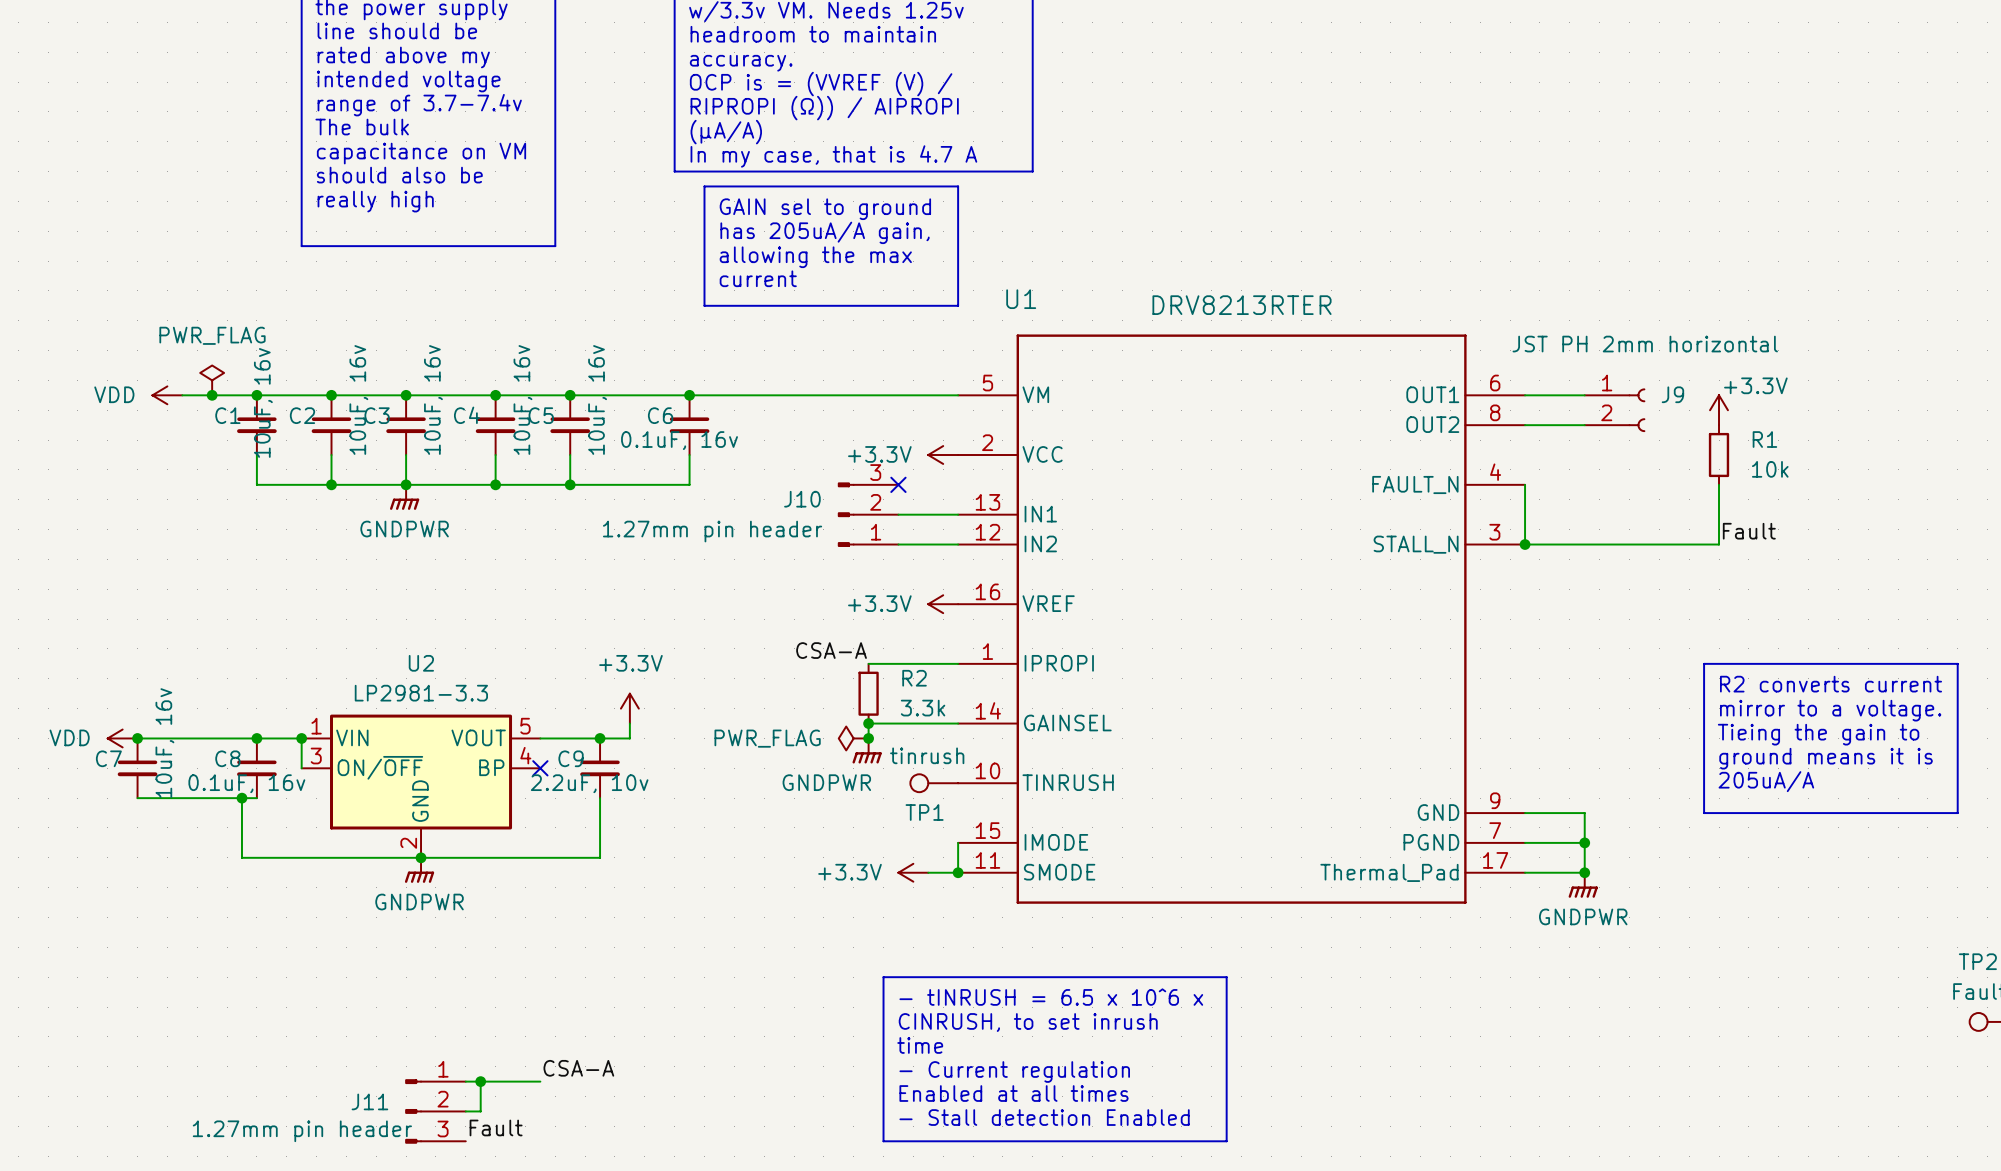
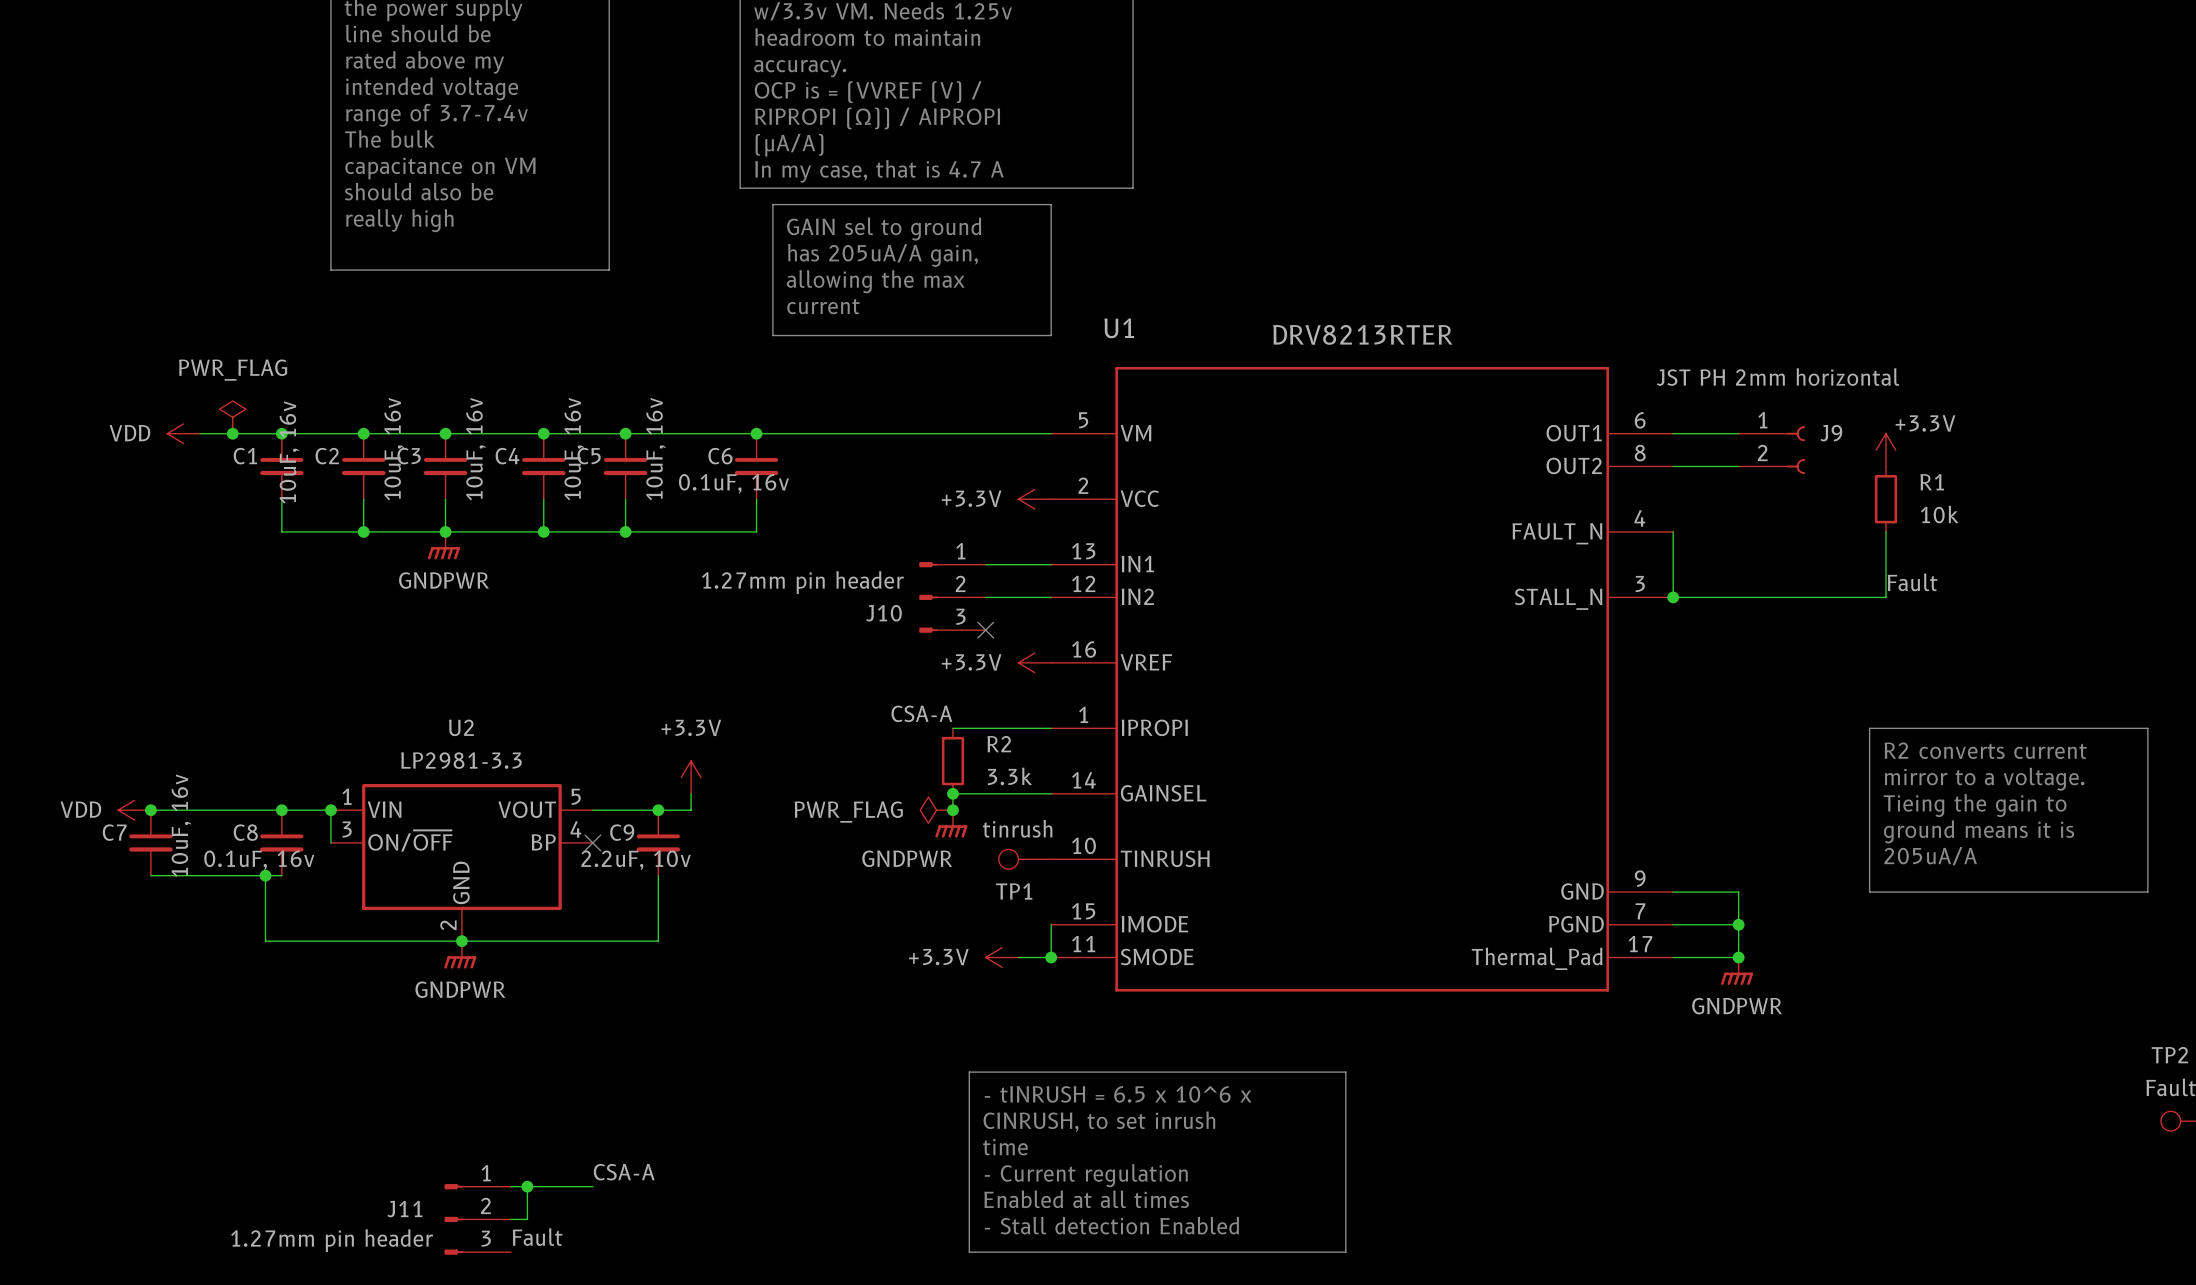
no-connect mark: (898, 484) -> none
J10 flip: as is (846, 514) -> up-down (928, 597)
no-connect mark: none -> (985, 630)

